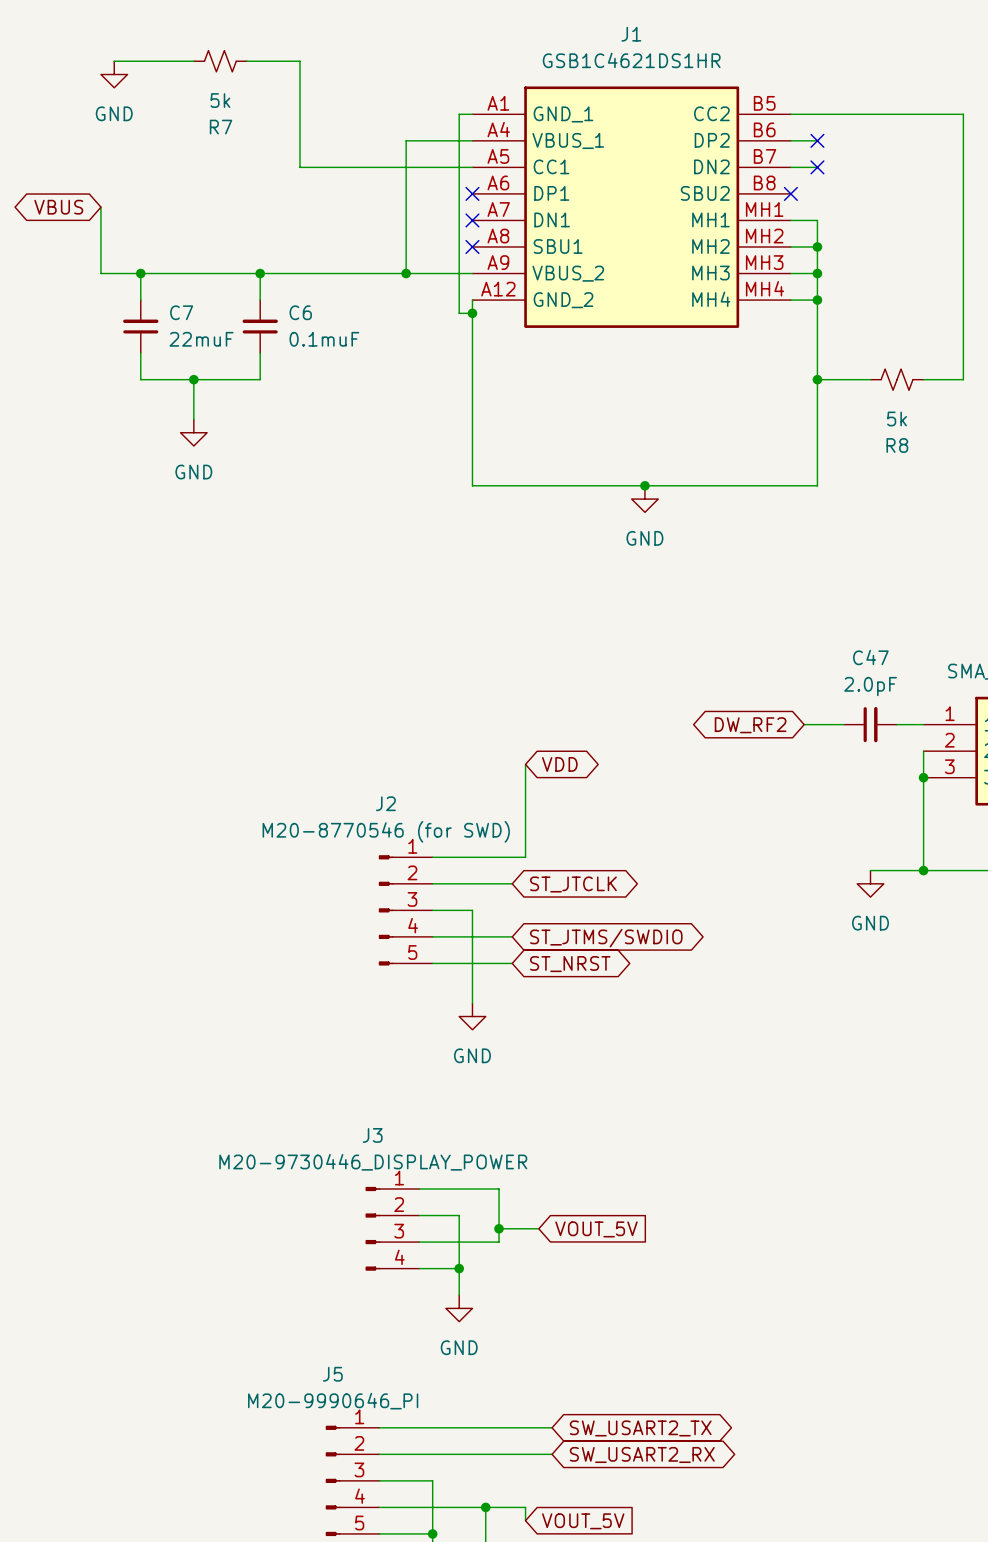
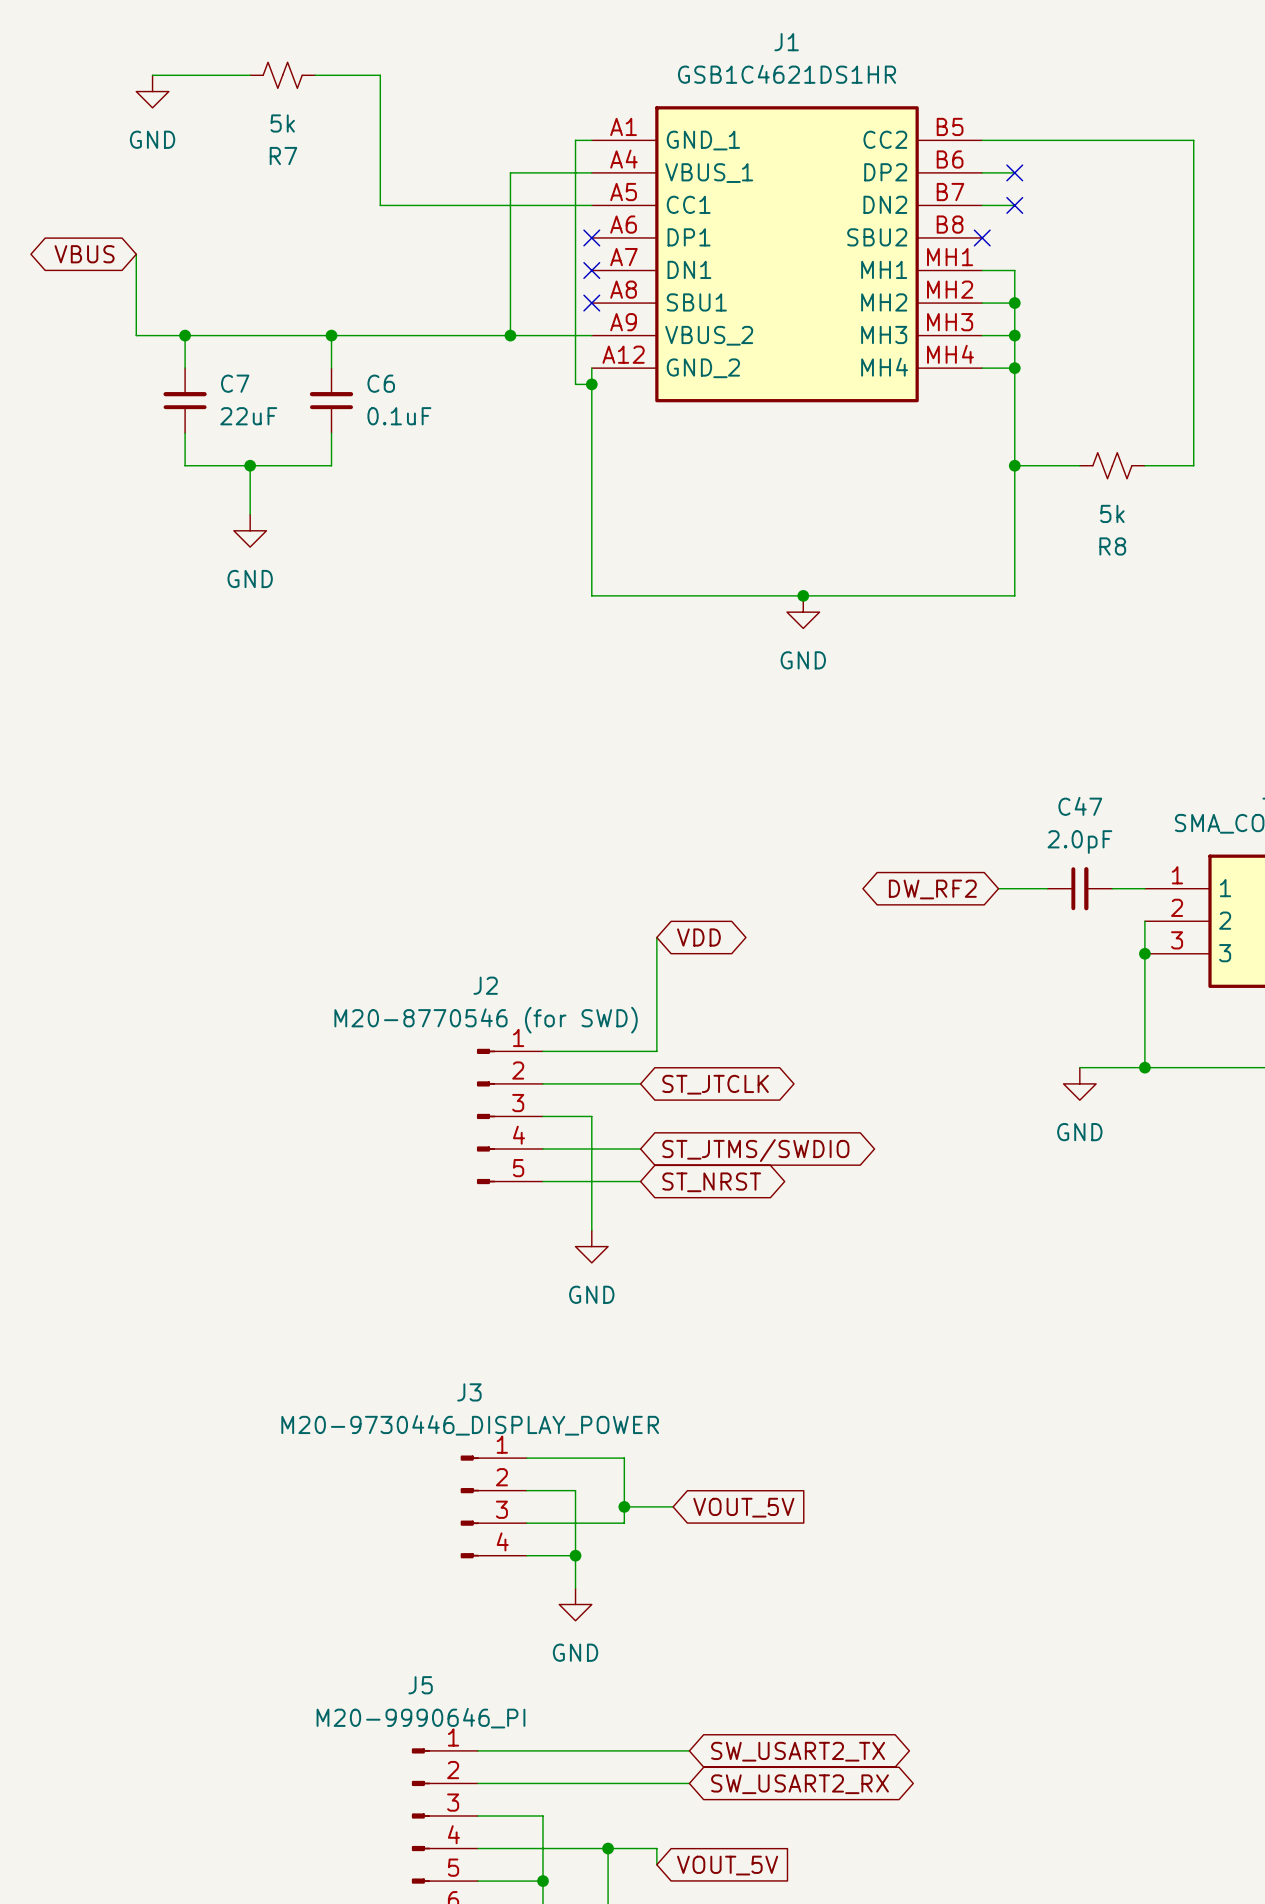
C7 value: 22muF (201, 339) -> 22uF (248, 416)
C6 value: 0.1muF (324, 339) -> 0.1uF (399, 416)

